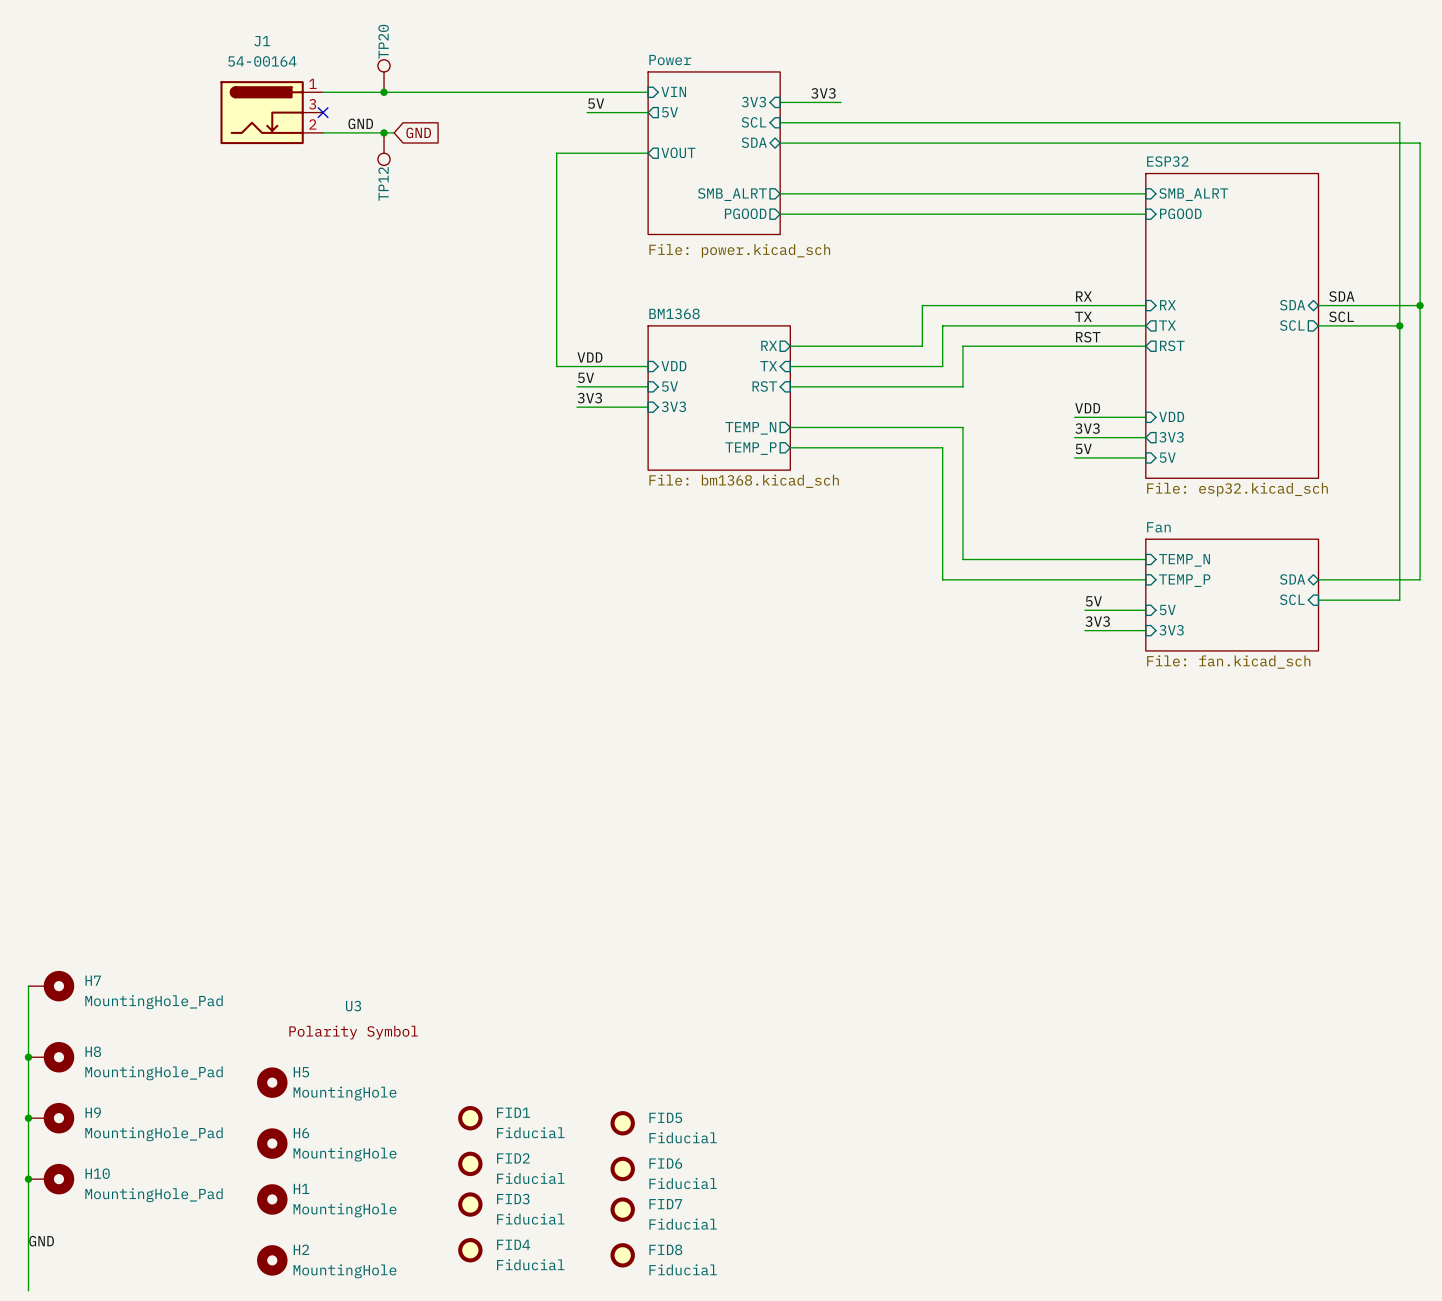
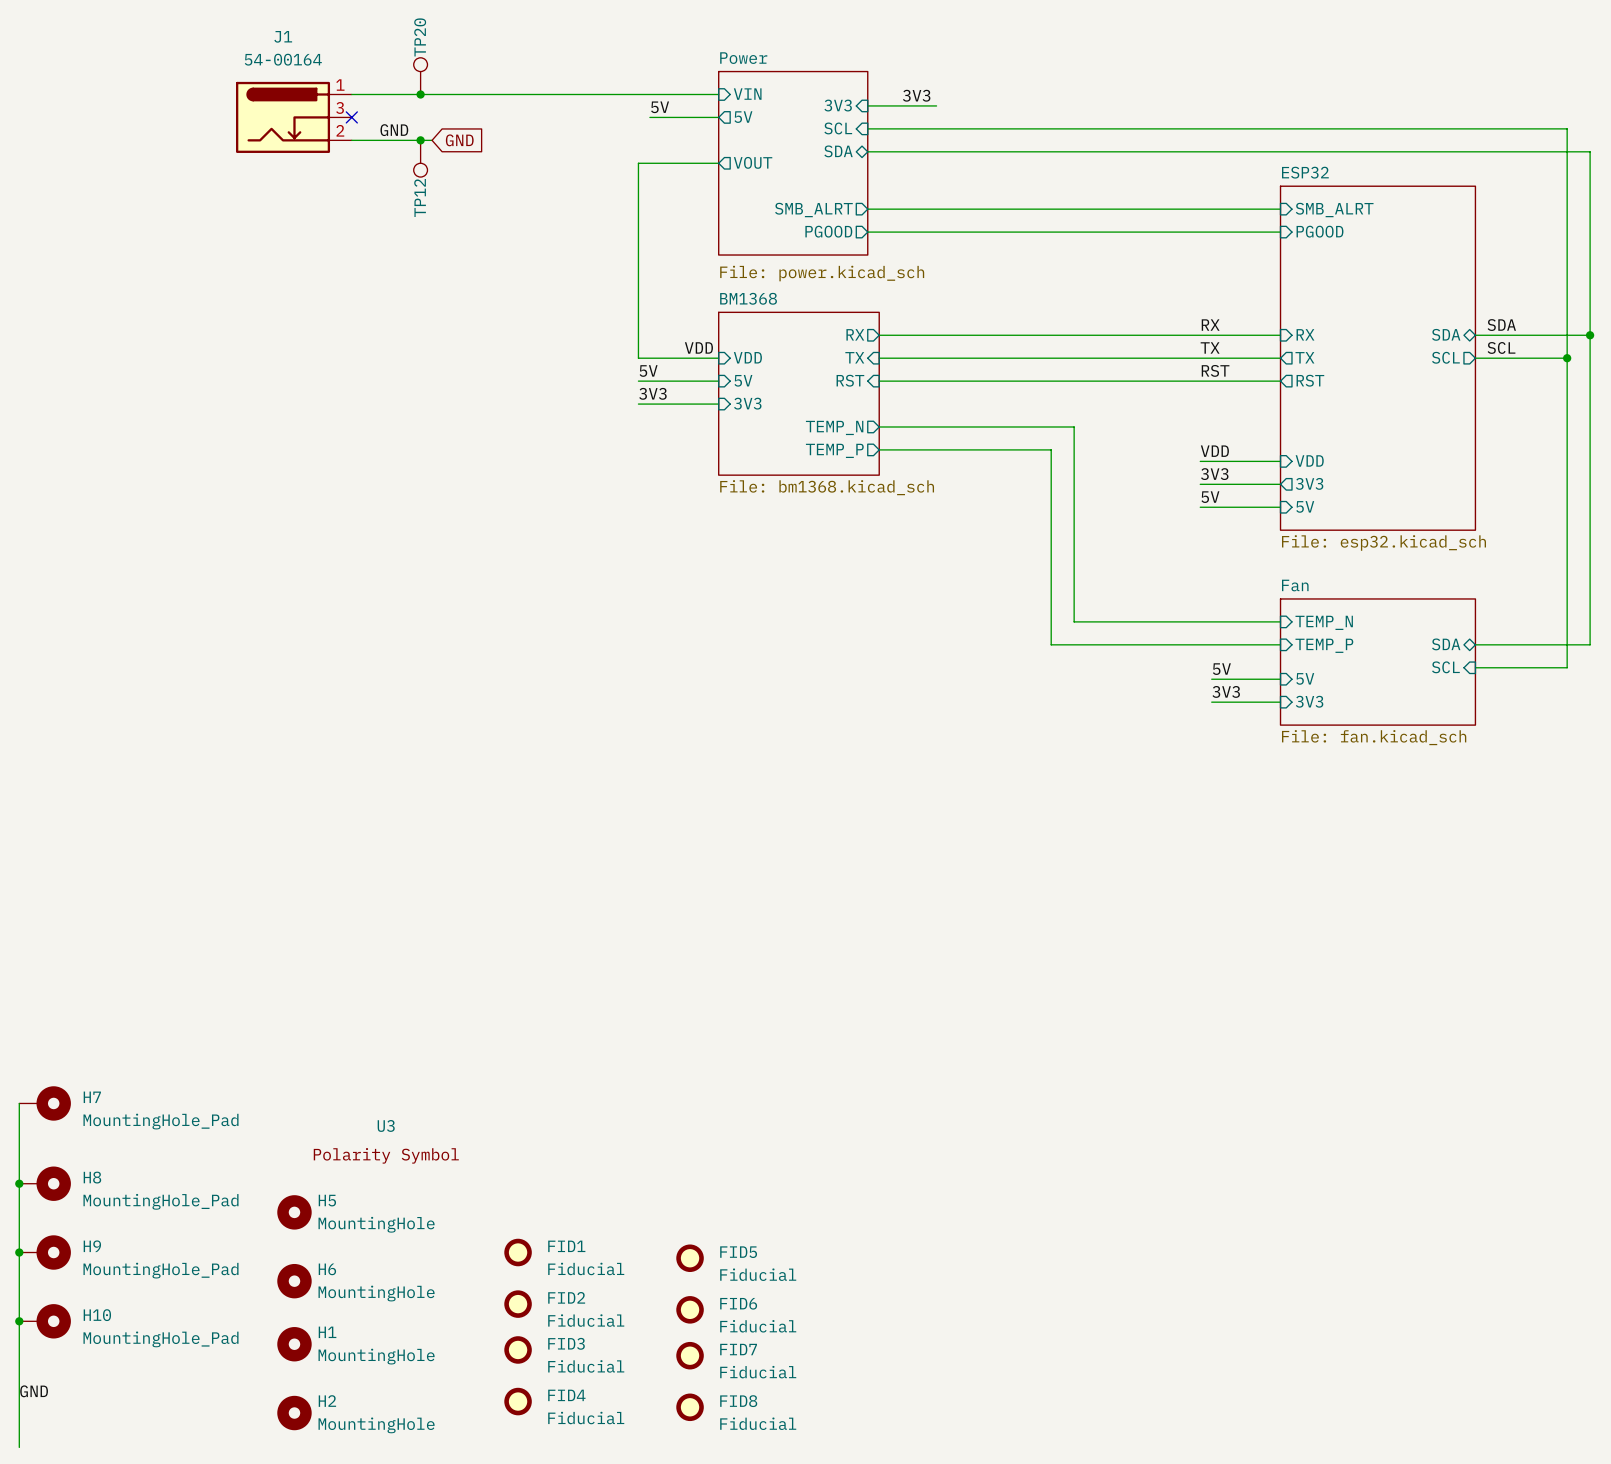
wire: (577, 153) (556, 153) (556, 366) (577, 366) -> (638, 163) (638, 358) (718, 358)
sheet pin: none -> RX (855, 334)
wire: (922, 305) (922, 346) -> (1028, 335) (879, 335)
label: none -> VDD (698, 347)
sheet pin: none -> VDD (747, 357)
wire: (942, 325) (942, 366) (790, 366) -> (1051, 358) (879, 358)
sheet pin shape: output (769, 345) -> input (850, 380)
sheet pin: RX (769, 345) -> RST (850, 380)
wire: (962, 346) (962, 386) -> (1074, 381) (1028, 381)
label: VDD (589, 357) -> 3V3 (652, 393)
sheet pin: VDD (673, 366) -> 3V3 (747, 403)
sheet pin position: TX (768, 366) -> TX (854, 357)
label position: 5V (586, 377) -> 5V (648, 371)
wire: (577, 386) (648, 386) -> (638, 381) (718, 381)
sheet pin position: 5V (670, 386) -> 5V (743, 380)
sheet pin shape: input (764, 386) -> output (834, 427)
sheet pin: RST (764, 386) -> TEMP_N (834, 427)
label: 3V3 (589, 398) -> none
sheet BM1368 position: (719, 398) -> (798, 393)
sheet pin: 3V3 (673, 406) -> none
wire: (577, 407) (648, 407) -> none
wire: (790, 427) (962, 427) -> (1074, 426) (1074, 472)
sheet pin: TEMP_N (750, 428) -> none
wire: (790, 447) (942, 447) -> (879, 449) (1051, 449) (1051, 495)
sheet pin position: TEMP_P (750, 448) -> TEMP_P (834, 450)

